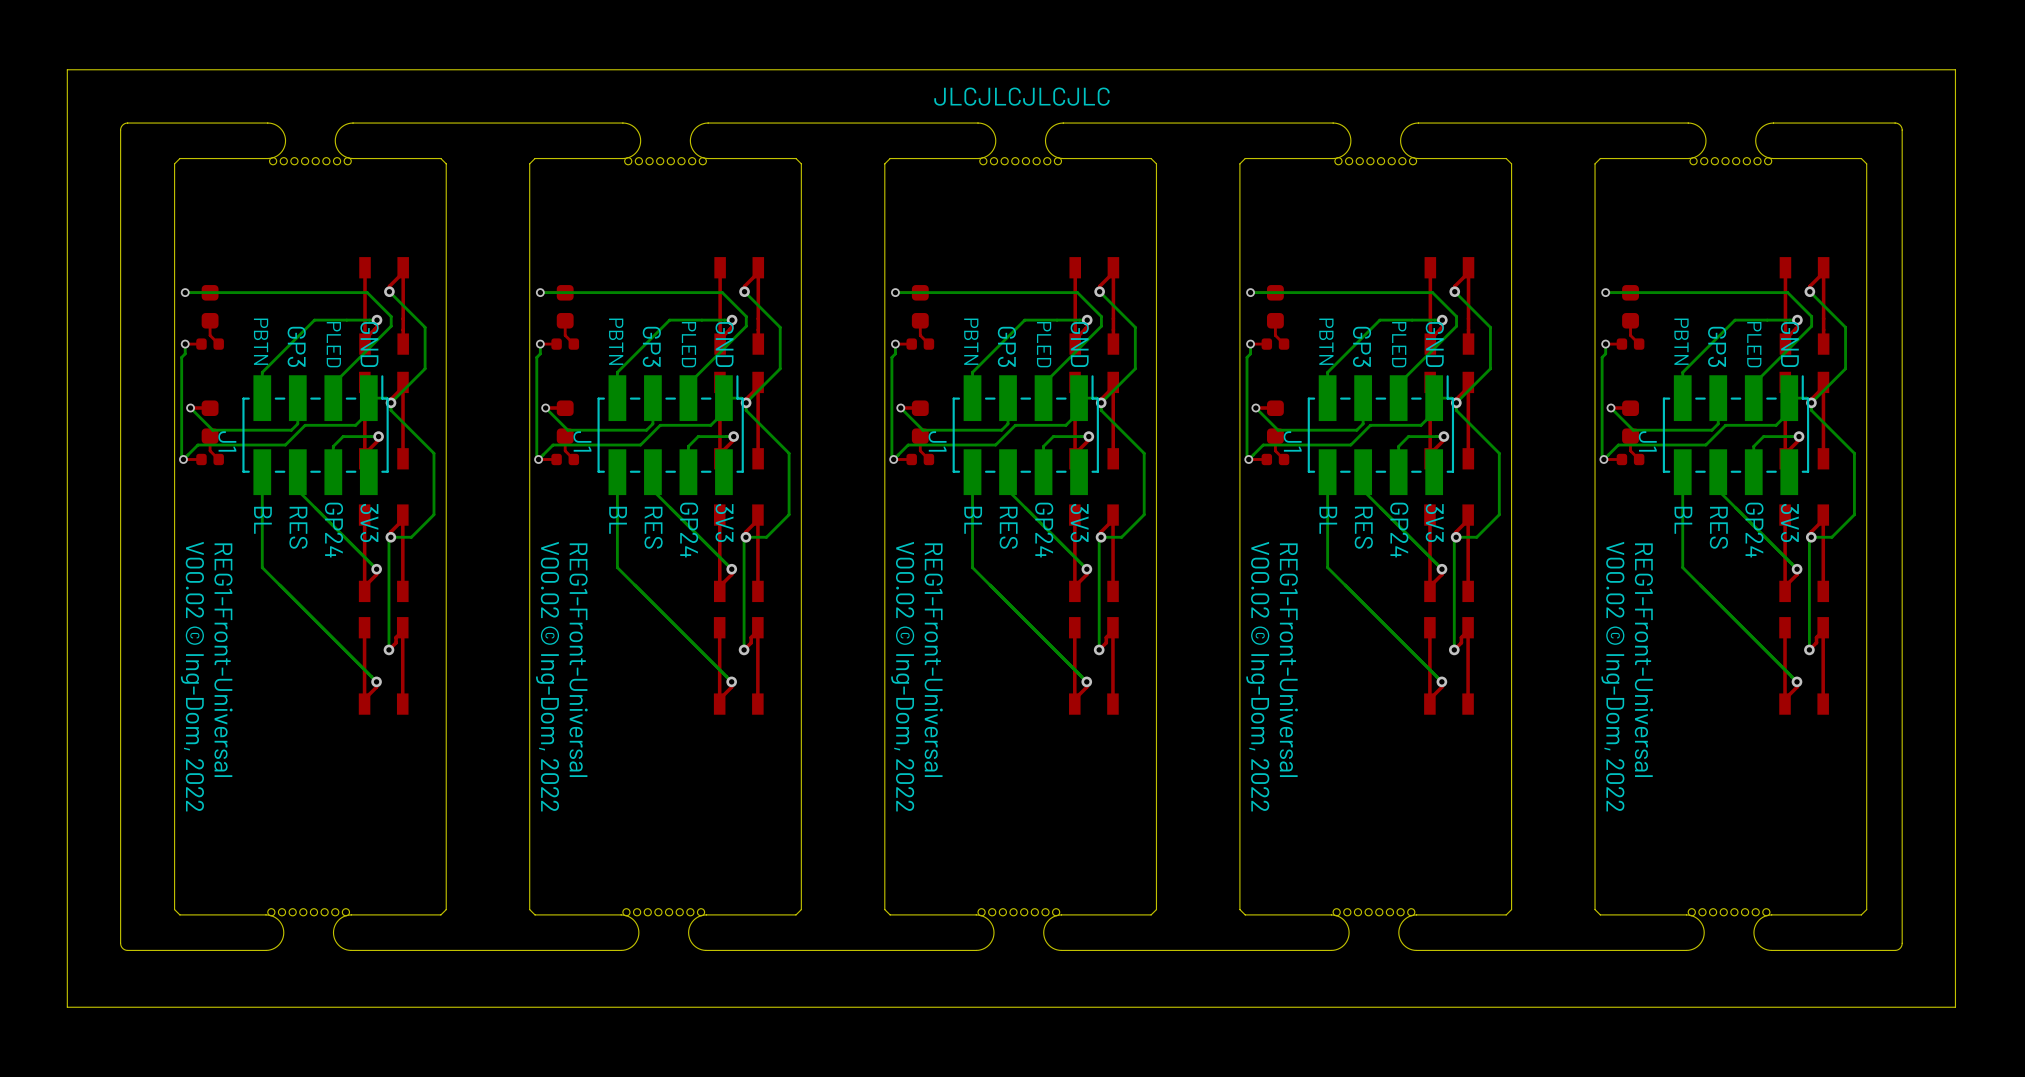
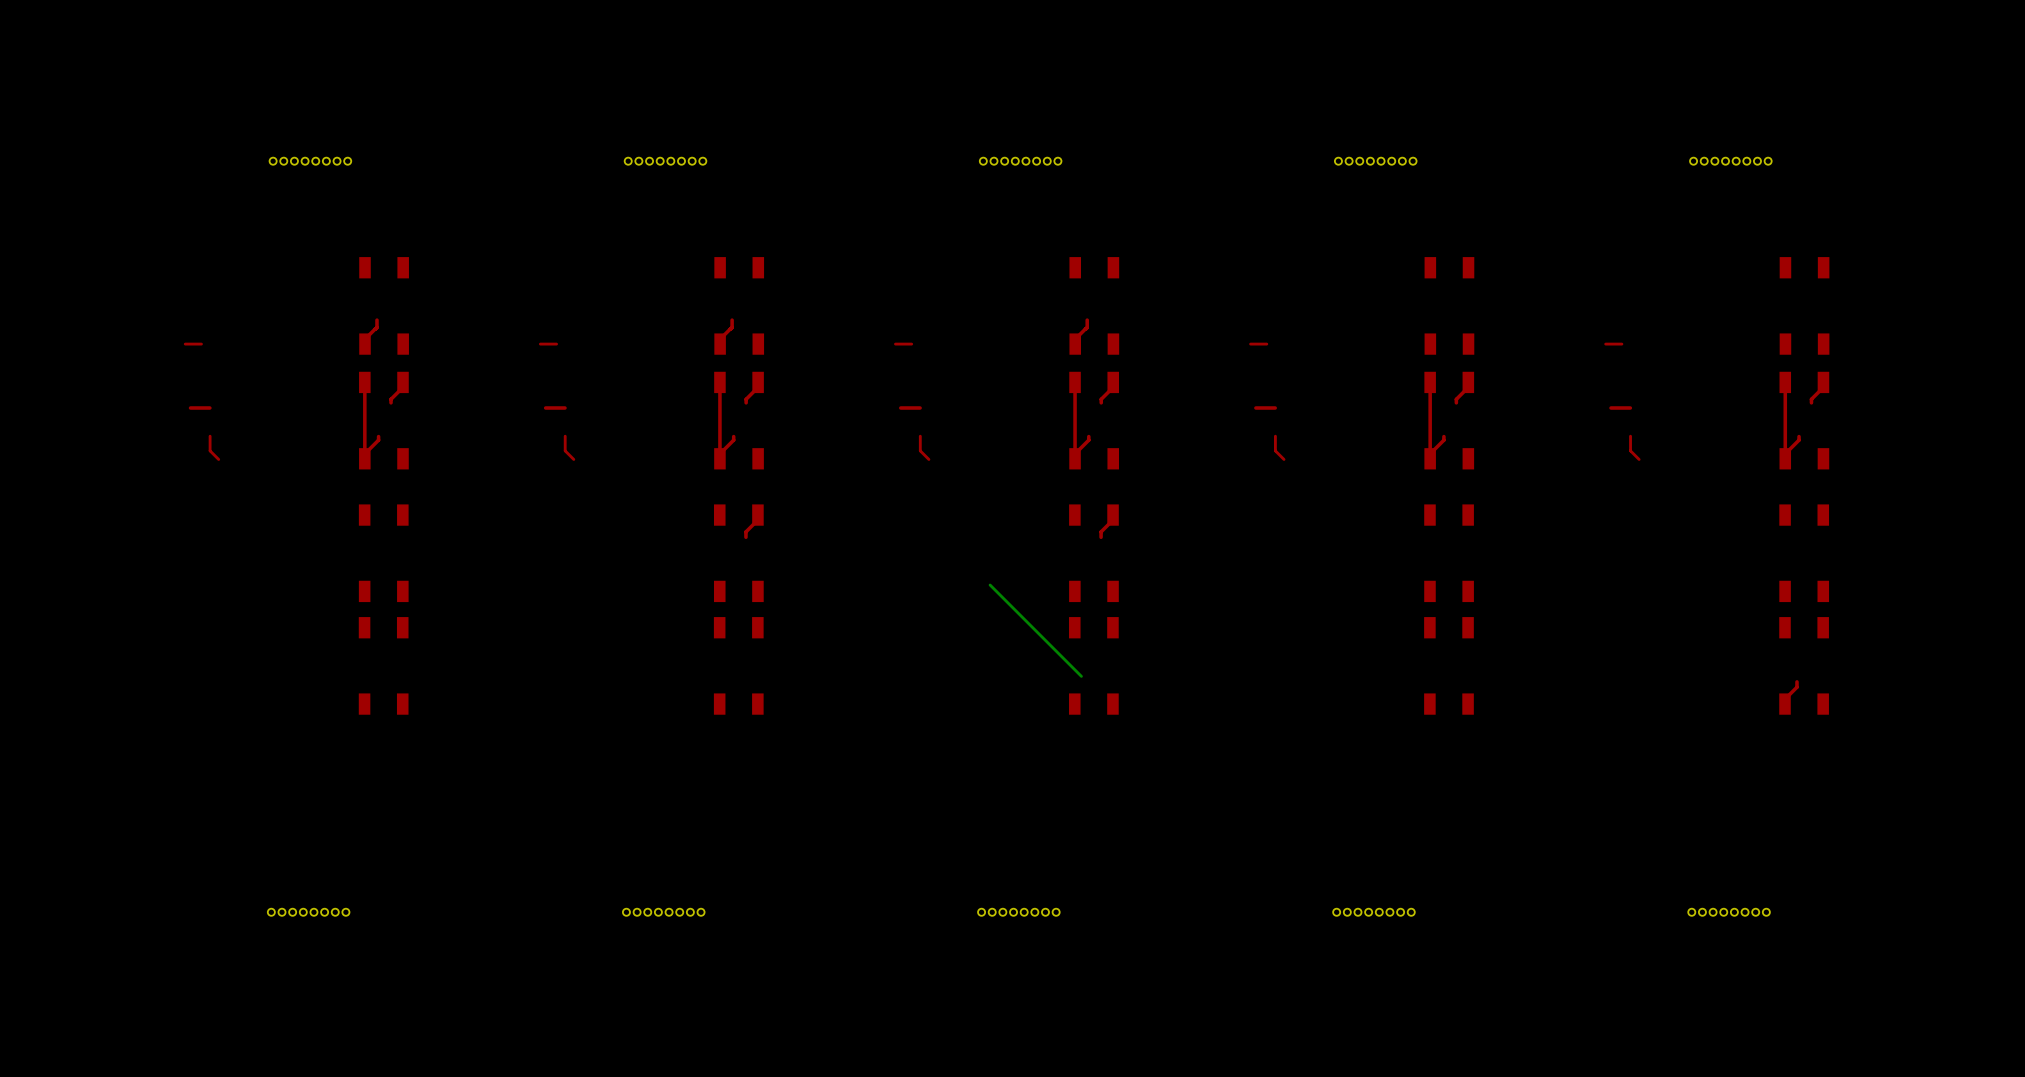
board edge: (1955, 69) (67, 69) (67, 1007) (1955, 1007) (1955, 69) -> none
text: JLCJLCJLCJLC (1021, 96) -> none
board edge: (267, 123) (127, 123) (123, 124) (120, 129) (120, 943) (122, 948) (126, 950) (268, 950) (278, 945) (283, 934) (280, 921) (270, 915) (179, 914) (174, 909) (174, 163) (179, 158) (274, 157) (283, 149) (285, 138) (280, 128) (267, 123) -> none
board edge: (622, 123) (353, 123) (342, 126) (335, 136) (337, 149) (348, 157) (440, 158) (446, 163) (446, 909) (440, 914) (344, 916) (335, 923) (333, 934) (337, 943) (346, 949) (621, 950) (631, 946) (638, 937) (636, 923) (625, 915) (535, 914) (529, 909) (529, 163) (535, 158) (629, 157) (638, 149) (640, 138) (635, 128) (622, 123) -> none
board edge: (978, 123) (708, 123) (697, 126) (690, 136) (692, 149) (703, 157) (796, 158) (801, 163) (801, 909) (796, 914) (699, 916) (690, 923) (688, 934) (692, 943) (701, 949) (976, 950) (987, 946) (993, 937) (991, 923) (980, 915) (890, 914) (884, 909) (884, 163) (890, 158) (984, 157) (993, 149) (995, 138) (990, 128) (978, 123) -> none
board edge: (1333, 123) (1063, 123) (1052, 126) (1046, 136) (1047, 149) (1058, 157) (1151, 158) (1156, 163) (1156, 909) (1151, 914) (1054, 916) (1046, 923) (1043, 934) (1047, 943) (1056, 949) (1331, 950) (1342, 946) (1348, 937) (1346, 923) (1335, 915) (1245, 914) (1239, 909) (1239, 163) (1245, 158) (1339, 157) (1349, 147) (1350, 136) (1343, 126) (1333, 123) -> none
board edge: (1688, 123) (1418, 123) (1407, 126) (1401, 136) (1402, 149) (1413, 157) (1506, 158) (1511, 163) (1511, 909) (1506, 914) (1409, 916) (1402, 921) (1398, 932) (1402, 943) (1411, 949) (1686, 950) (1697, 946) (1703, 937) (1701, 923) (1691, 915) (1600, 914) (1595, 909) (1595, 163) (1600, 158) (1695, 157) (1704, 147) (1705, 136) (1699, 126) (1688, 123) -> none
board edge: (1895, 123) (1771, 123) (1760, 128) (1755, 138) (1759, 151) (1768, 157) (1861, 158) (1866, 163) (1866, 909) (1861, 914) (1764, 916) (1756, 923) (1754, 934) (1759, 945) (1769, 950) (1895, 950) (1899, 948) (1902, 944) (1902, 130) (1900, 125) (1895, 123) -> none
top track: (365, 267) (365, 344) -> none
top track: (403, 267) (403, 344) -> none
top track: (720, 267) (720, 344) -> none
top track: (758, 267) (758, 344) -> none
top track: (1075, 267) (1075, 344) -> none
top track: (1113, 267) (1113, 344) -> none
top track: (1430, 267) (1430, 344) (1430, 339) (1440, 328) (1442, 327) (1442, 320) -> none
top track: (1468, 267) (1468, 344) -> none
top track: (1785, 267) (1785, 344) (1785, 339) (1795, 328) (1797, 327) (1797, 320) -> none
top track: (1823, 267) (1823, 344) -> none
top track: (403, 272) (389, 286) (389, 291) -> none
top track: (758, 272) (744, 286) (744, 291) -> none
top track: (1113, 272) (1099, 286) (1099, 291) -> none
top track: (1468, 272) (1454, 286) (1454, 291) -> none
top track: (1823, 272) (1809, 286) (1809, 291) -> none
bottom track: (389, 291) (425, 327) (425, 368) (391, 402) -> none
via: (389, 291) -> none
bottom track: (744, 291) (780, 327) (780, 368) (746, 402) -> none
via: (744, 291) -> none
bottom track: (1099, 291) (1135, 327) (1135, 368) (1101, 402) -> none
via: (1099, 291) -> none
bottom track: (1454, 291) (1490, 327) (1490, 368) (1456, 402) -> none
via: (1454, 291) -> none
bottom track: (1809, 291) (1845, 327) (1845, 368) (1811, 402) -> none
via: (1809, 291) -> none
bottom track: (185, 292) (367, 292) (391, 316) (391, 326) (333, 384) (333, 398) -> none
via: (185, 292) -> none
bottom track: (540, 292) (722, 292) (746, 316) (746, 326) (688, 384) (688, 398) -> none
via: (540, 292) -> none
bottom track: (895, 292) (1077, 292) (1101, 316) (1101, 326) (1043, 384) (1043, 398) -> none
via: (895, 292) -> none
bottom track: (1250, 292) (1432, 292) (1456, 316) (1456, 326) (1398, 384) (1398, 398) -> none
via: (1250, 292) -> none
bottom track: (1605, 292) (1787, 292) (1811, 316) (1811, 326) (1753, 384) (1753, 398) -> none
via: (1605, 292) -> none
part: (210, 306) -> none
part: (565, 306) -> none
part: (920, 306) -> none
part: (1275, 306) -> none
part: (1630, 306) -> none
top track: (210, 320) (210, 335) (218, 344) -> none
bottom track: (376, 320) (314, 320) (262, 372) (262, 398) -> none
via: (376, 320) -> none
top track: (565, 320) (565, 335) (573, 344) -> none
bottom track: (732, 320) (669, 320) (617, 372) (617, 398) -> none
via: (732, 320) -> none
top track: (920, 320) (920, 335) (928, 344) -> none
bottom track: (1087, 320) (1024, 320) (972, 372) (972, 398) -> none
via: (1087, 320) -> none
top track: (1275, 320) (1275, 335) (1284, 344) -> none
bottom track: (1442, 320) (1379, 320) (1327, 372) (1327, 398) -> none
via: (1442, 320) -> none
top track: (1630, 320) (1630, 335) (1639, 344) -> none
bottom track: (1797, 320) (1735, 320) (1682, 372) (1682, 398) -> none
via: (1797, 320) -> none
text: PBTN (261, 341) -> none
text: PBTN (616, 341) -> none
text: PBTN (971, 341) -> none
text: PBTN (1326, 341) -> none
text: PBTN (1681, 341) -> none
bottom track: (185, 344) (185, 353) (181, 357) (181, 457) (184, 460) -> none
via: (185, 344) -> none
part: (210, 344) -> none
text: PLED (333, 344) -> none
text: GND (369, 344) -> none
bottom track: (540, 344) (540, 353) (536, 357) (536, 457) (539, 460) -> none
via: (540, 344) -> none
part: (565, 344) -> none
text: PLED (688, 344) -> none
text: GND (724, 344) -> none
bottom track: (895, 344) (895, 353) (891, 357) (891, 457) (894, 460) -> none
via: (895, 344) -> none
part: (920, 344) -> none
text: PLED (1044, 344) -> none
text: GND (1079, 344) -> none
bottom track: (1250, 344) (1250, 353) (1247, 357) (1247, 457) (1249, 460) -> none
via: (1250, 344) -> none
part: (1275, 344) -> none
text: PLED (1399, 344) -> none
text: GND (1434, 344) -> none
bottom track: (1605, 344) (1605, 353) (1602, 357) (1602, 457) (1604, 460) -> none
via: (1605, 344) -> none
part: (1630, 344) -> none
text: PLED (1754, 344) -> none
text: GND (1789, 344) -> none
text: GP3 (296, 346) -> none
text: GP3 (651, 346) -> none
text: GP3 (1006, 346) -> none
text: GP3 (1362, 346) -> none
text: GP3 (1717, 346) -> none
top track: (403, 382) (403, 458) -> none
top track: (758, 382) (758, 458) -> none
top track: (1113, 382) (1113, 458) -> none
top track: (1468, 382) (1468, 458) -> none
top track: (1823, 382) (1823, 458) -> none
bottom track: (297, 398) (297, 423) (291, 430) (212, 430) (190, 408) -> none
bottom track: (652, 398) (652, 423) (646, 430) (567, 430) (545, 408) -> none
bottom track: (1008, 398) (1008, 423) (1001, 430) (922, 430) (900, 408) -> none
bottom track: (1363, 398) (1363, 423) (1356, 430) (1278, 430) (1255, 408) -> none
bottom track: (1718, 398) (1718, 423) (1711, 430) (1633, 430) (1611, 408) -> none
bottom track: (391, 402) (391, 410) (433, 453) (433, 514) (411, 537) (390, 537) (388, 539) (388, 649) -> none
bottom track: (391, 402) (386, 398) (368, 398) (368, 412) (355, 425) (305, 425) (285, 445) (197, 445) (183, 459) -> none
via: (391, 402) -> none
bottom track: (746, 402) (746, 410) (789, 453) (789, 514) (766, 537) (745, 537) (744, 539) (744, 649) -> none
bottom track: (746, 402) (741, 398) (723, 398) (723, 412) (710, 425) (660, 425) (640, 445) (553, 445) (538, 459) -> none
via: (746, 402) -> none
bottom track: (1101, 402) (1101, 410) (1144, 453) (1144, 514) (1121, 537) (1101, 537) (1099, 539) (1099, 649) -> none
bottom track: (1101, 402) (1096, 398) (1079, 398) (1079, 412) (1065, 425) (1015, 425) (995, 445) (908, 445) (893, 459) -> none
via: (1101, 402) -> none
bottom track: (1456, 402) (1456, 410) (1499, 453) (1499, 514) (1476, 537) (1456, 537) (1454, 539) (1454, 649) -> none
bottom track: (1456, 402) (1451, 398) (1434, 398) (1434, 412) (1421, 425) (1370, 425) (1350, 445) (1263, 445) (1248, 459) -> none
via: (1456, 402) -> none
bottom track: (1811, 402) (1811, 410) (1854, 453) (1854, 514) (1831, 537) (1811, 537) (1809, 539) (1809, 649) -> none
bottom track: (1811, 402) (1806, 398) (1789, 398) (1789, 412) (1776, 425) (1725, 425) (1705, 445) (1618, 445) (1603, 459) -> none
via: (1811, 402) -> none
via: (190, 408) -> none
via: (545, 408) -> none
via: (900, 408) -> none
via: (1255, 408) -> none
via: (1611, 408) -> none
part: (210, 422) -> none
part: (565, 422) -> none
part: (920, 422) -> none
part: (1275, 422) -> none
part: (1630, 422) -> none
J1: (315, 435) -> none
J1: (670, 435) -> none
J1: (1025, 435) -> none
J1: (1380, 435) -> none
J1: (1736, 435) -> none
bottom track: (378, 436) (343, 436) (333, 446) (333, 472) -> none
via: (378, 436) -> none
bottom track: (733, 436) (698, 436) (688, 446) (688, 472) -> none
via: (733, 436) -> none
bottom track: (1088, 436) (1053, 436) (1043, 446) (1043, 472) -> none
via: (1088, 436) -> none
bottom track: (1443, 436) (1408, 436) (1398, 446) (1398, 472) -> none
via: (1443, 436) -> none
bottom track: (1799, 436) (1763, 436) (1753, 446) (1753, 472) -> none
via: (1799, 436) -> none
via: (183, 459) -> none
top track: (201, 459) (183, 459) -> none
part: (210, 459) -> none
via: (538, 459) -> none
top track: (556, 459) (538, 459) -> none
part: (565, 459) -> none
via: (893, 459) -> none
top track: (911, 459) (893, 459) -> none
part: (920, 459) -> none
via: (1248, 459) -> none
top track: (1266, 459) (1248, 459) -> none
part: (1275, 459) -> none
via: (1603, 459) -> none
top track: (1621, 459) (1603, 459) -> none
part: (1630, 459) -> none
bottom track: (262, 472) (262, 567) (376, 681) -> none
bottom track: (297, 472) (297, 490) (376, 569) -> none
bottom track: (617, 472) (617, 567) (731, 681) -> none
bottom track: (652, 472) (652, 490) (731, 569) -> none
bottom track: (972, 472) (972, 567) (1086, 681) -> none
bottom track: (1008, 472) (1008, 490) (1086, 569) -> none
bottom track: (1327, 472) (1327, 567) (1441, 681) -> none
bottom track: (1363, 472) (1363, 490) (1441, 569) -> none
bottom track: (1682, 472) (1682, 567) (1796, 681) -> none
bottom track: (1718, 472) (1718, 490) (1797, 569) -> none
top track: (364, 515) (364, 591) -> none
top track: (402, 515) (402, 591) -> none
top track: (719, 515) (719, 591) -> none
top track: (757, 515) (757, 591) -> none
top track: (1074, 515) (1074, 591) -> none
top track: (1113, 515) (1113, 591) -> none
top track: (1429, 515) (1429, 591) -> none
top track: (1468, 515) (1468, 591) -> none
top track: (1785, 515) (1785, 591) -> none
top track: (1823, 515) (1823, 591) -> none
top track: (402, 519) (390, 531) (390, 537) -> none
top track: (1468, 519) (1456, 531) (1456, 537) -> none
top track: (1823, 519) (1811, 531) (1811, 537) -> none
text: BL (262, 520) -> none
text: BL (618, 520) -> none
text: BL (973, 520) -> none
text: BL (1328, 520) -> none
text: BL (1683, 520) -> none
text: 3V3 (369, 522) -> none
text: 3V3 (724, 522) -> none
text: 3V3 (1079, 522) -> none
text: 3V3 (1434, 522) -> none
text: 3V3 (1789, 522) -> none
text: RES (298, 527) -> none
text: RES (653, 527) -> none
text: RES (1008, 527) -> none
text: RES (1363, 527) -> none
text: RES (1718, 527) -> none
text: GP24 (333, 530) -> none
text: GP24 (689, 530) -> none
text: GP24 (1044, 530) -> none
text: GP24 (1399, 530) -> none
text: GP24 (1754, 530) -> none
via: (390, 537) -> none
via: (745, 537) -> none
via: (1101, 537) -> none
via: (1456, 537) -> none
via: (1811, 537) -> none
top track: (376, 569) (376, 574) (364, 586) -> none
via: (376, 569) -> none
top track: (731, 569) (731, 574) (719, 586) -> none
via: (731, 569) -> none
top track: (1086, 569) (1086, 574) (1074, 586) -> none
via: (1086, 569) -> none
top track: (1441, 569) (1441, 574) (1429, 586) -> none
via: (1441, 569) -> none
top track: (1797, 569) (1797, 574) (1785, 586) -> none
via: (1797, 569) -> none
top track: (364, 627) (364, 704) -> none
top track: (402, 627) (402, 704) -> none
top track: (719, 627) (719, 704) -> none
top track: (757, 627) (757, 704) -> none
top track: (1074, 627) (1074, 704) -> none
top track: (1112, 627) (1112, 704) -> none
top track: (1429, 627) (1429, 704) -> none
top track: (1468, 627) (1468, 704) -> none
top track: (1785, 627) (1785, 704) -> none
top track: (1823, 627) (1823, 704) -> none
top track: (402, 630) (396, 637) (396, 642) (388, 649) -> none
top track: (757, 630) (751, 637) (751, 642) (744, 649) -> none
top track: (1112, 630) (1106, 637) (1106, 642) (1099, 649) -> none
top track: (1468, 630) (1461, 637) (1461, 642) (1454, 649) -> none
top track: (1823, 630) (1816, 637) (1816, 642) (1809, 649) -> none
via: (388, 649) -> none
via: (744, 649) -> none
via: (1099, 649) -> none
via: (1454, 649) -> none
via: (1809, 649) -> none
text: REG1-Front-Universal (223, 660) -> none
text: REG1-Front-Universal (578, 660) -> none
text: REG1-Front-Universal (933, 660) -> none
text: REG1-Front-Universal (1288, 660) -> none
text: REG1-Front-Universal (1643, 660) -> none
text: V00.02 © Ing-Dom, 2022 (192, 676) -> none
text: V00.02 © Ing-Dom, 2022 (547, 676) -> none
text: V00.02 © Ing-Dom, 2022 (902, 676) -> none
text: V00.02 © Ing-Dom, 2022 (1257, 676) -> none
text: V00.02 © Ing-Dom, 2022 (1612, 676) -> none
top track: (376, 681) (376, 687) (364, 699) -> none
via: (376, 681) -> none
top track: (731, 681) (731, 687) (719, 699) -> none
via: (731, 681) -> none
top track: (1086, 681) (1086, 687) (1074, 699) -> none
via: (1086, 681) -> none
top track: (1441, 681) (1441, 687) (1429, 699) -> none
via: (1441, 681) -> none
via: (1796, 681) -> none

